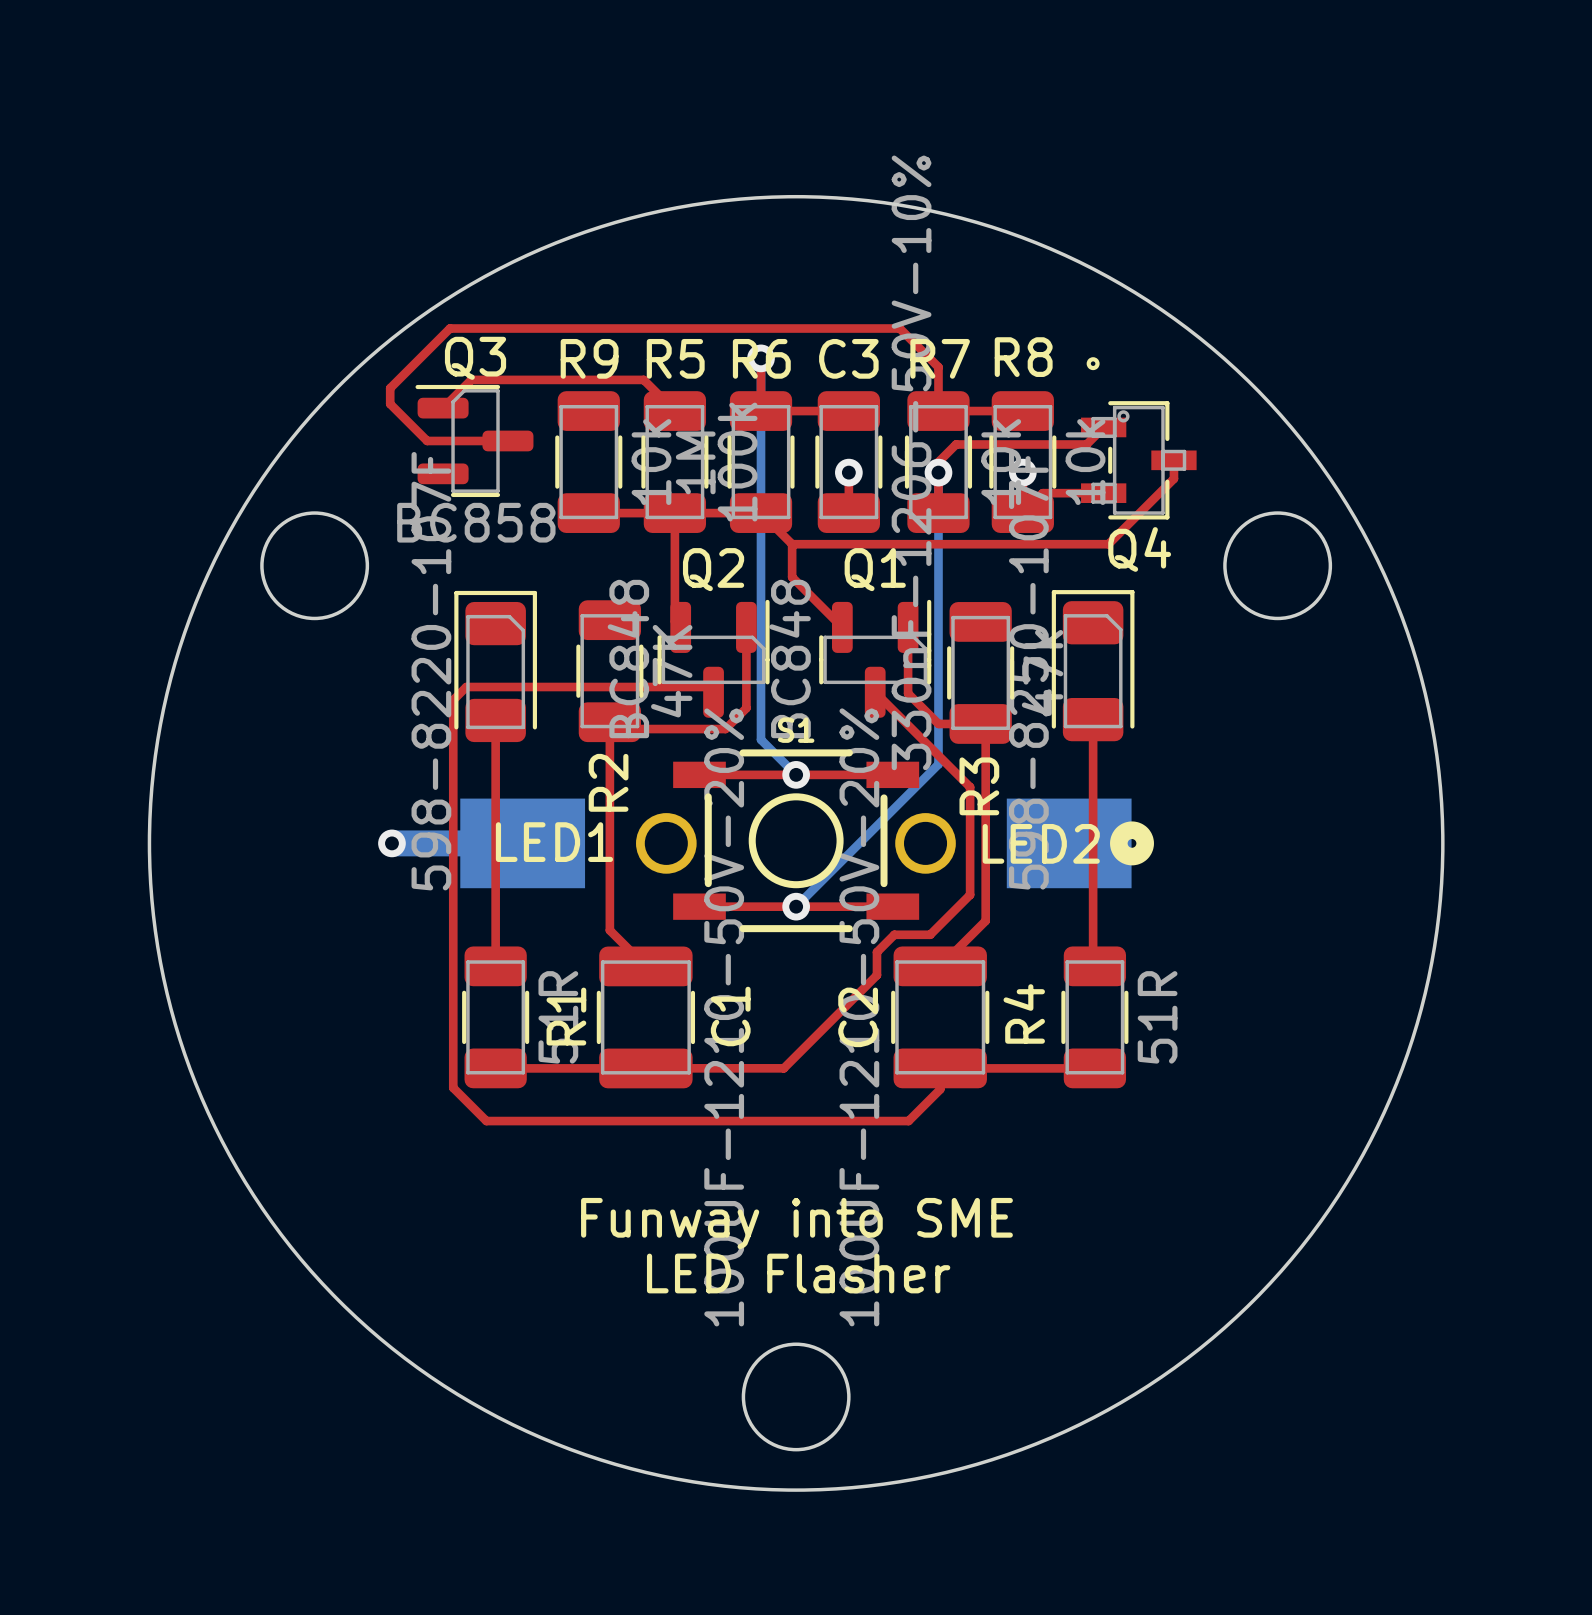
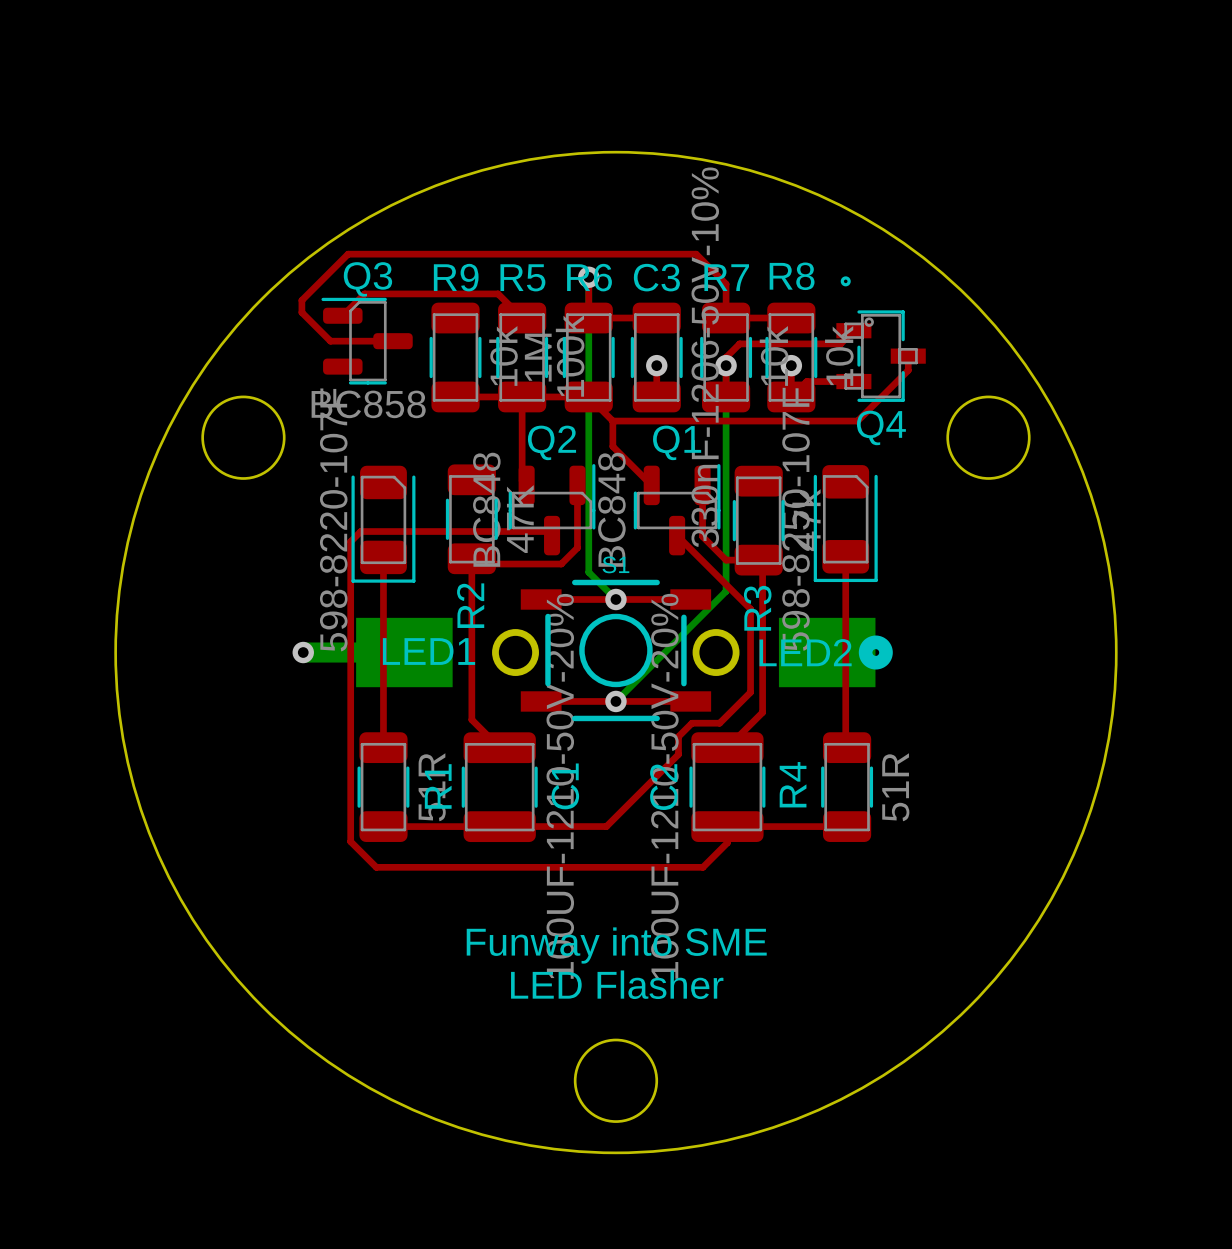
LED1 footprint: [454, 590, 537, 743] -> [351, 465, 416, 583]
LED2 footprint: [1051, 590, 1135, 742] -> [813, 465, 878, 583]

